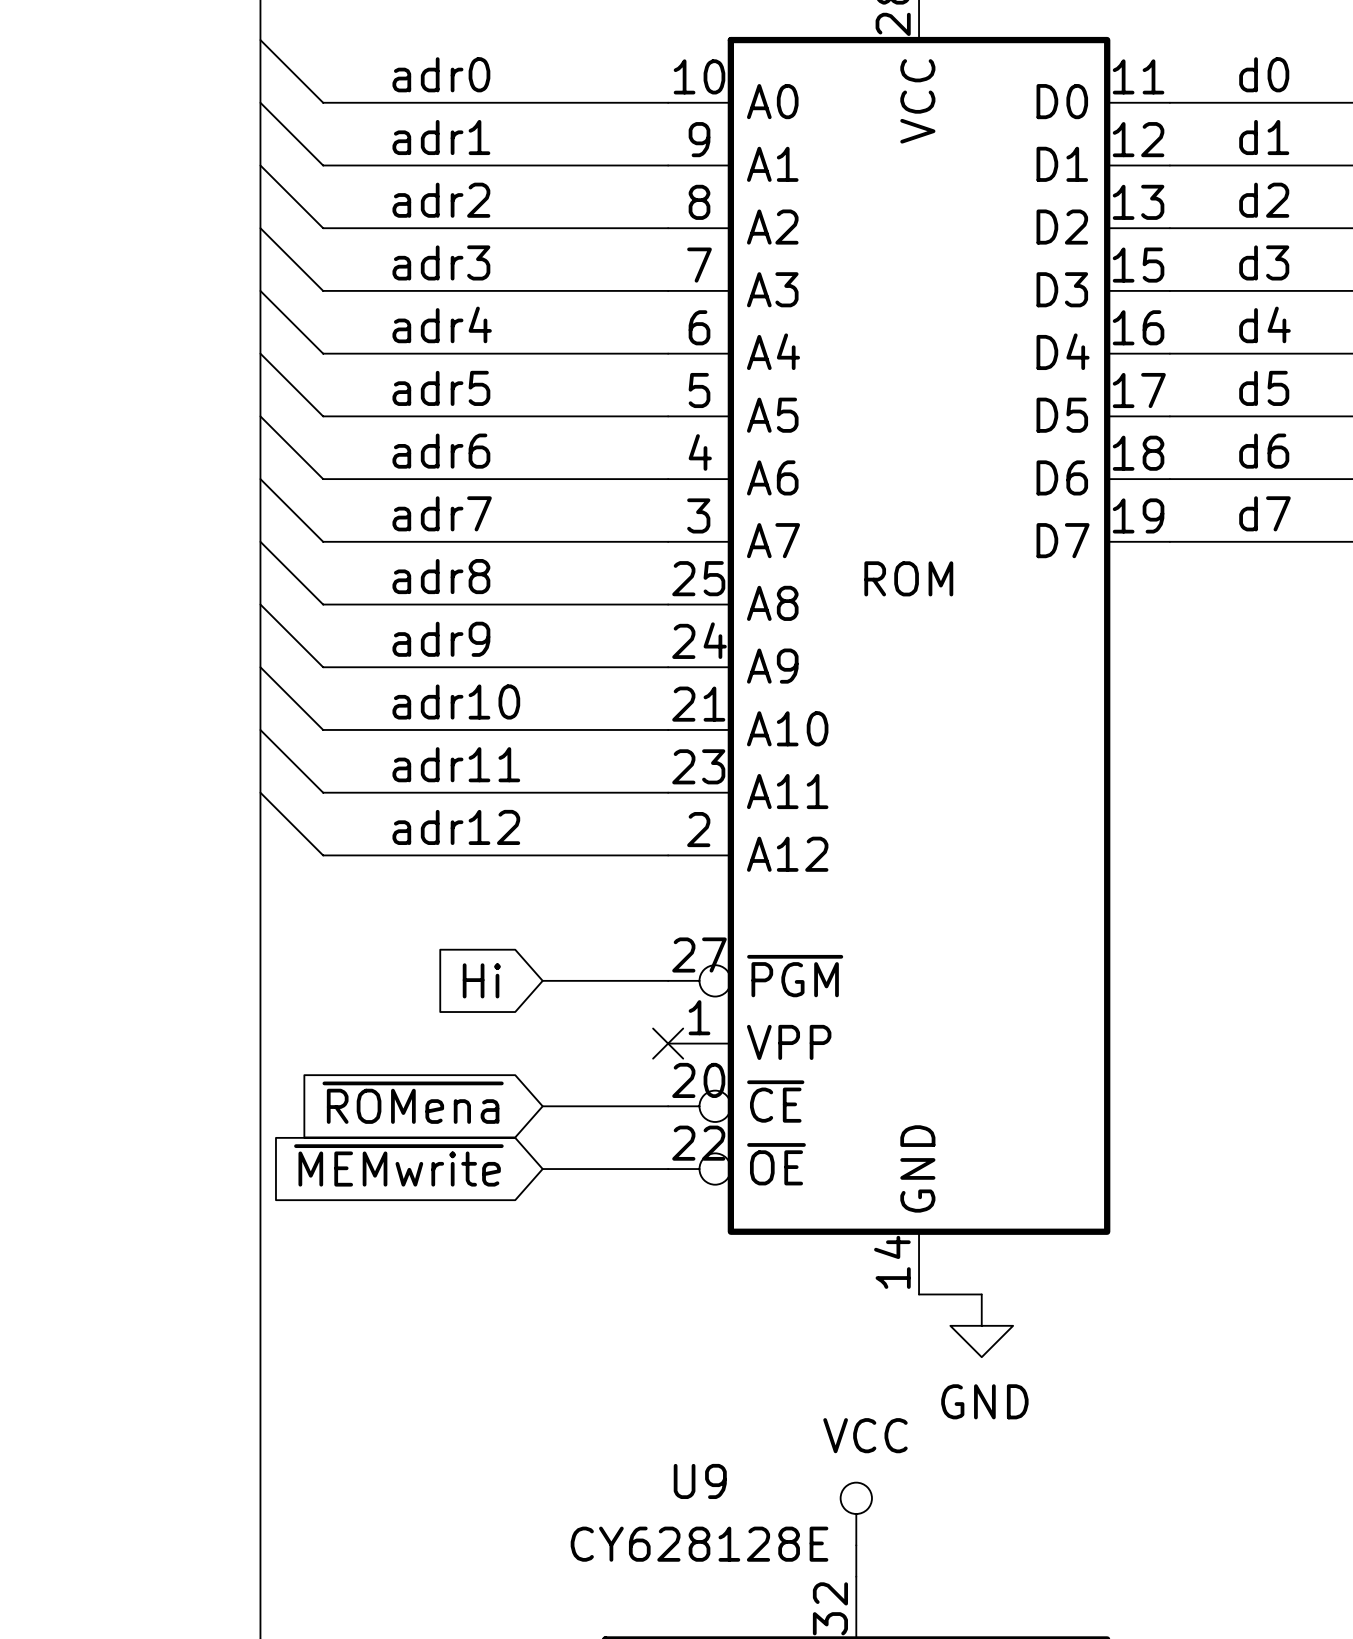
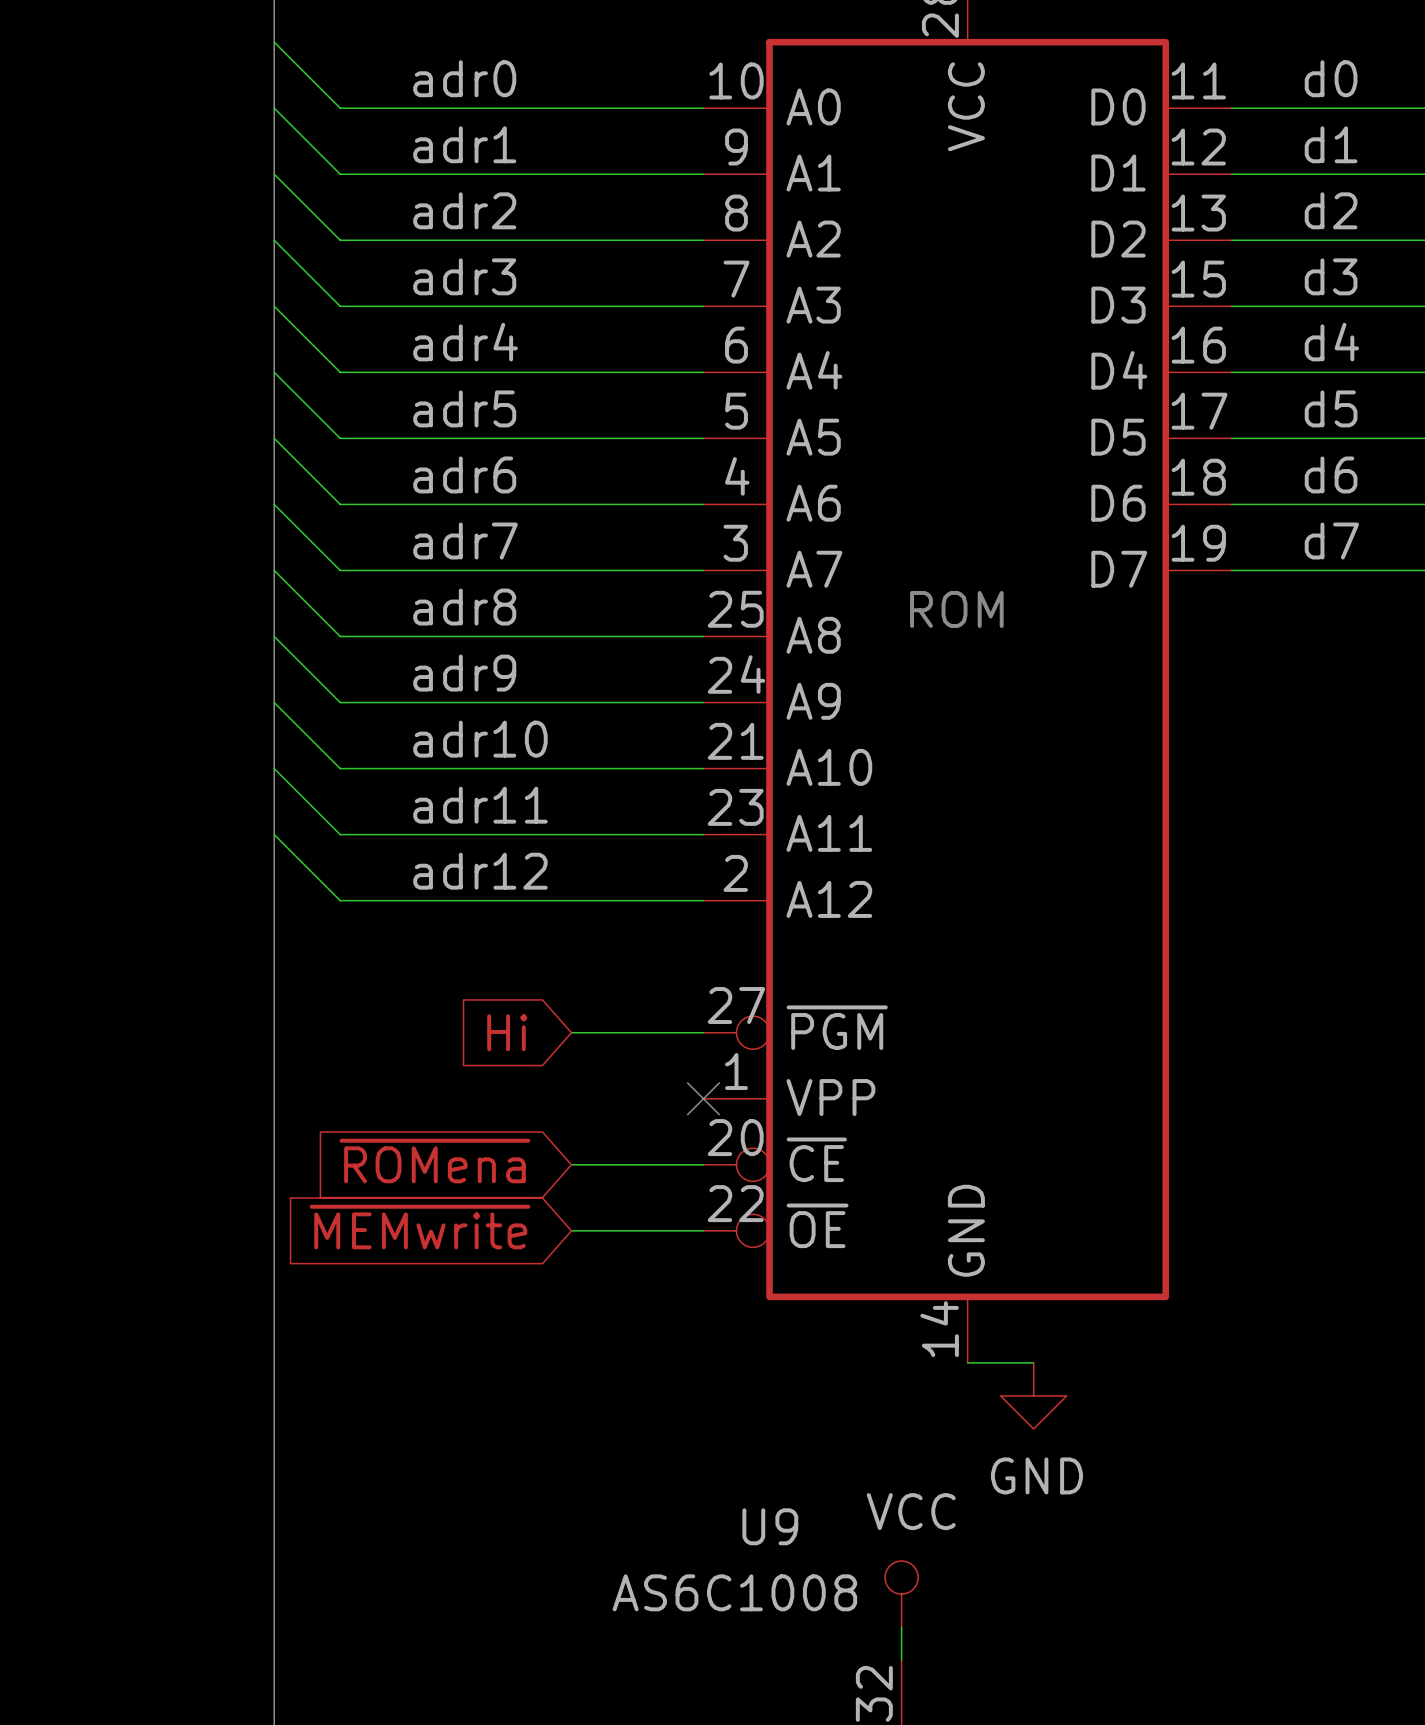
U9 name position: U9 (700, 1481) -> U9 (770, 1526)
U9 value: CY628128E (699, 1544) -> AS6C1008 (734, 1592)

